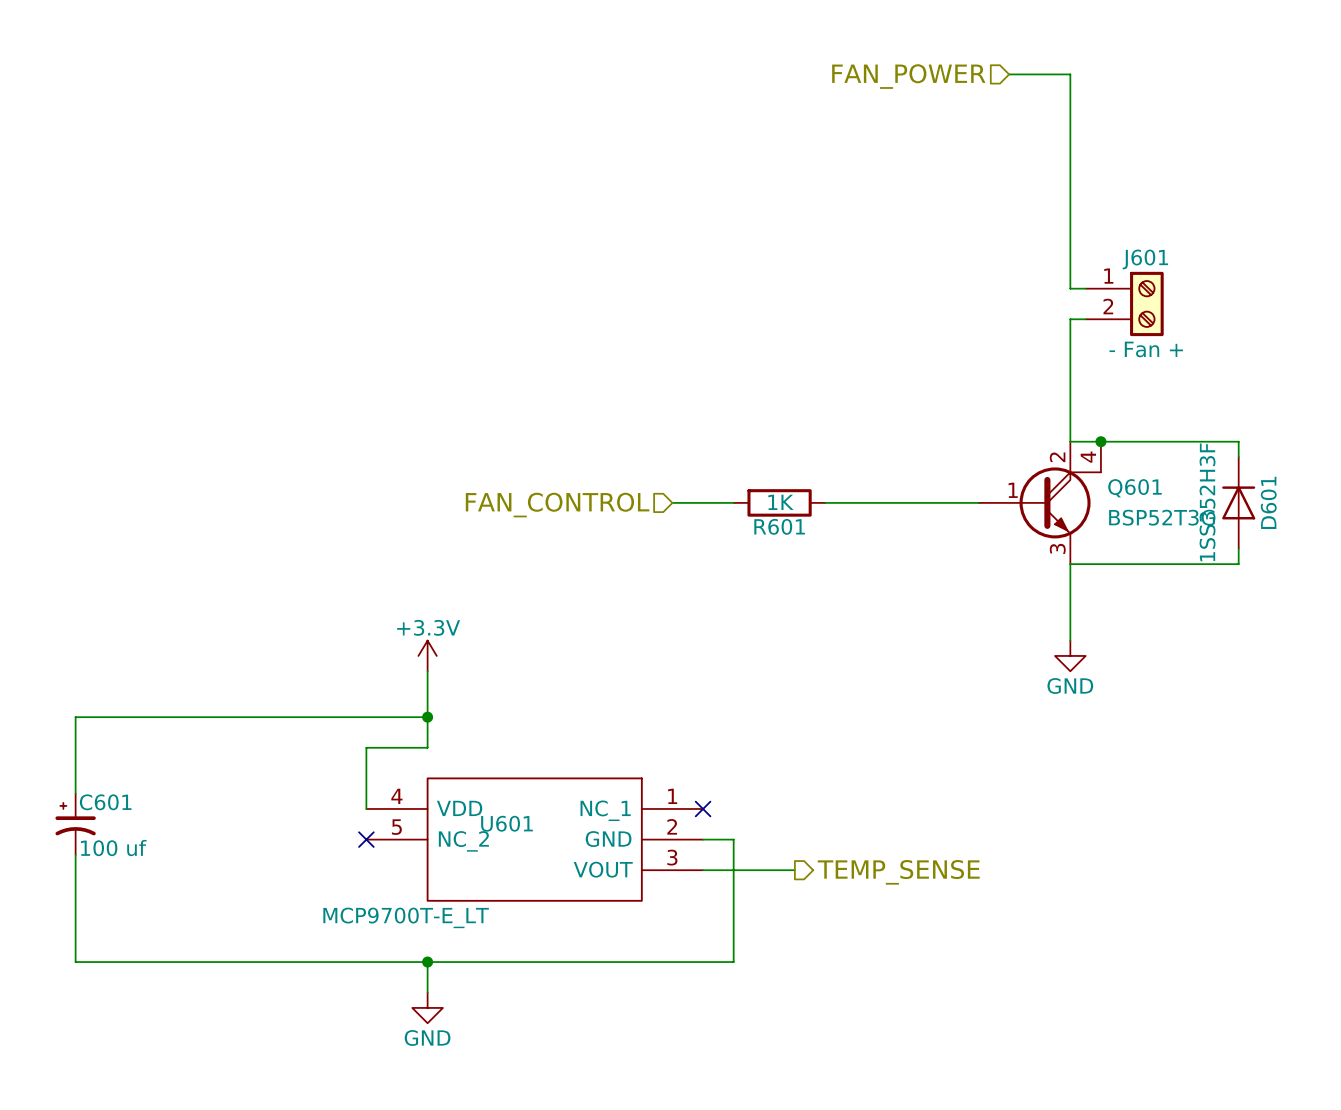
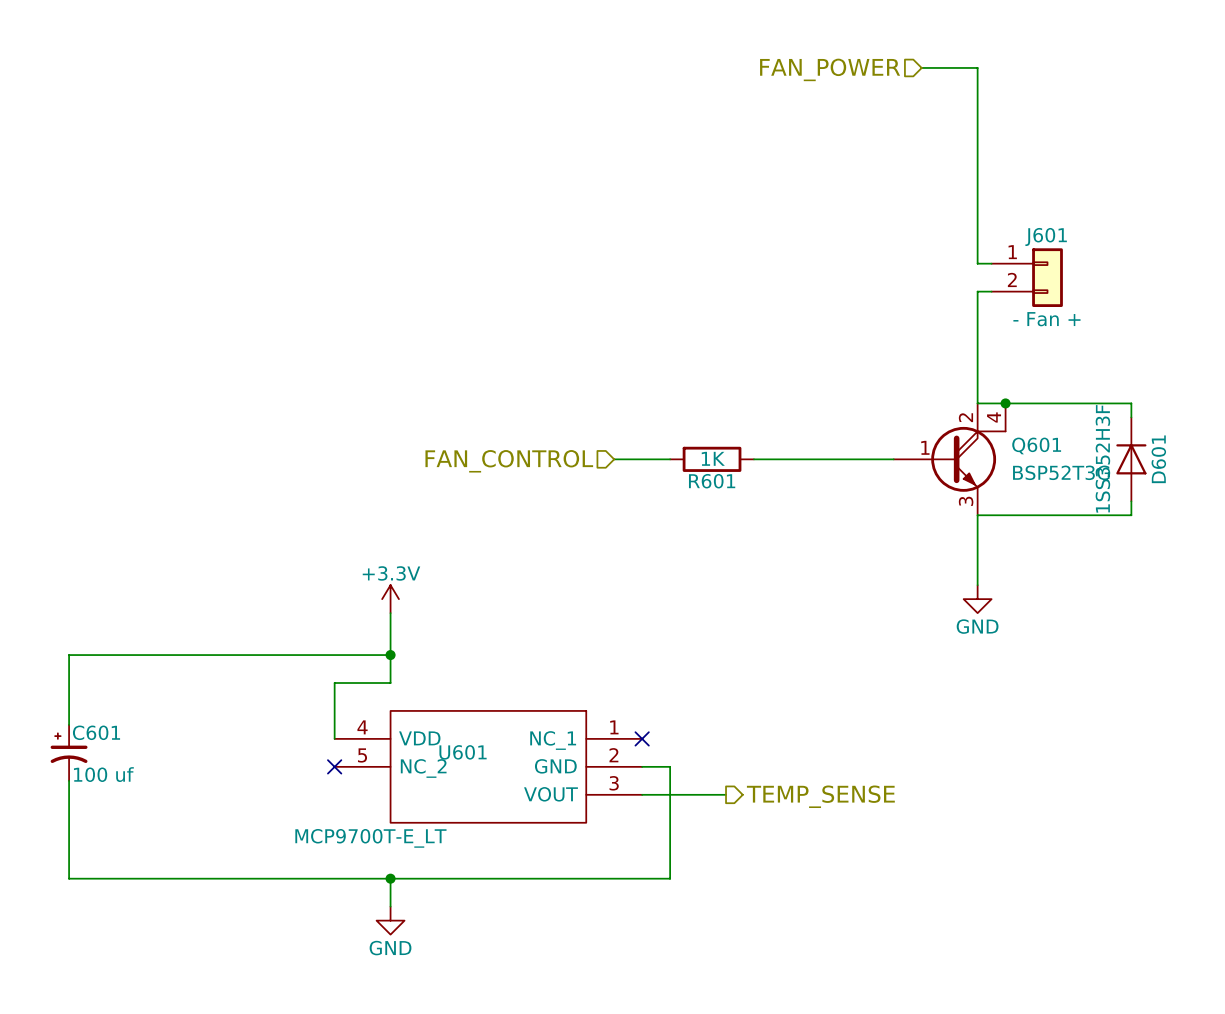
J601 symbol: [1085, 271, 1164, 337] -> [991, 248, 1063, 307]

